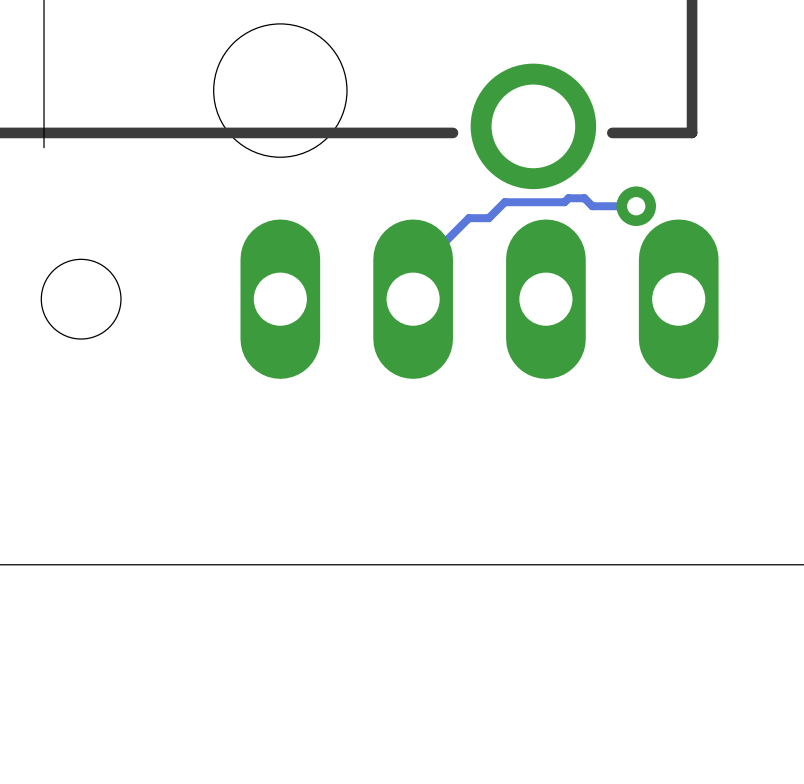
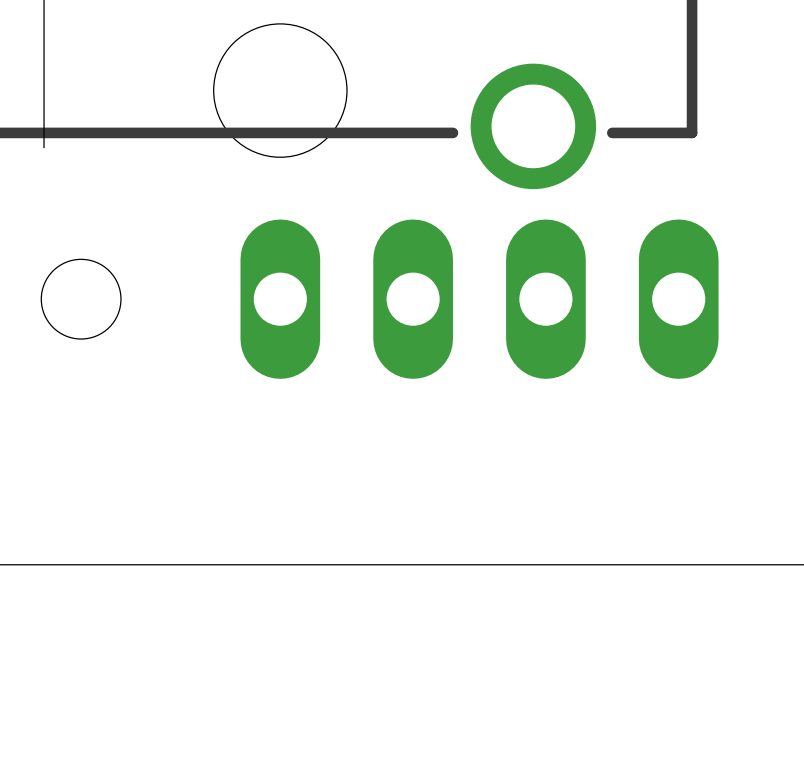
track: (636, 206) (592, 206) (584, 198) (568, 198) (564, 202) (504, 202) (488, 218) (468, 218) (413, 273) (413, 299) -> none
via: (636, 206) -> none

